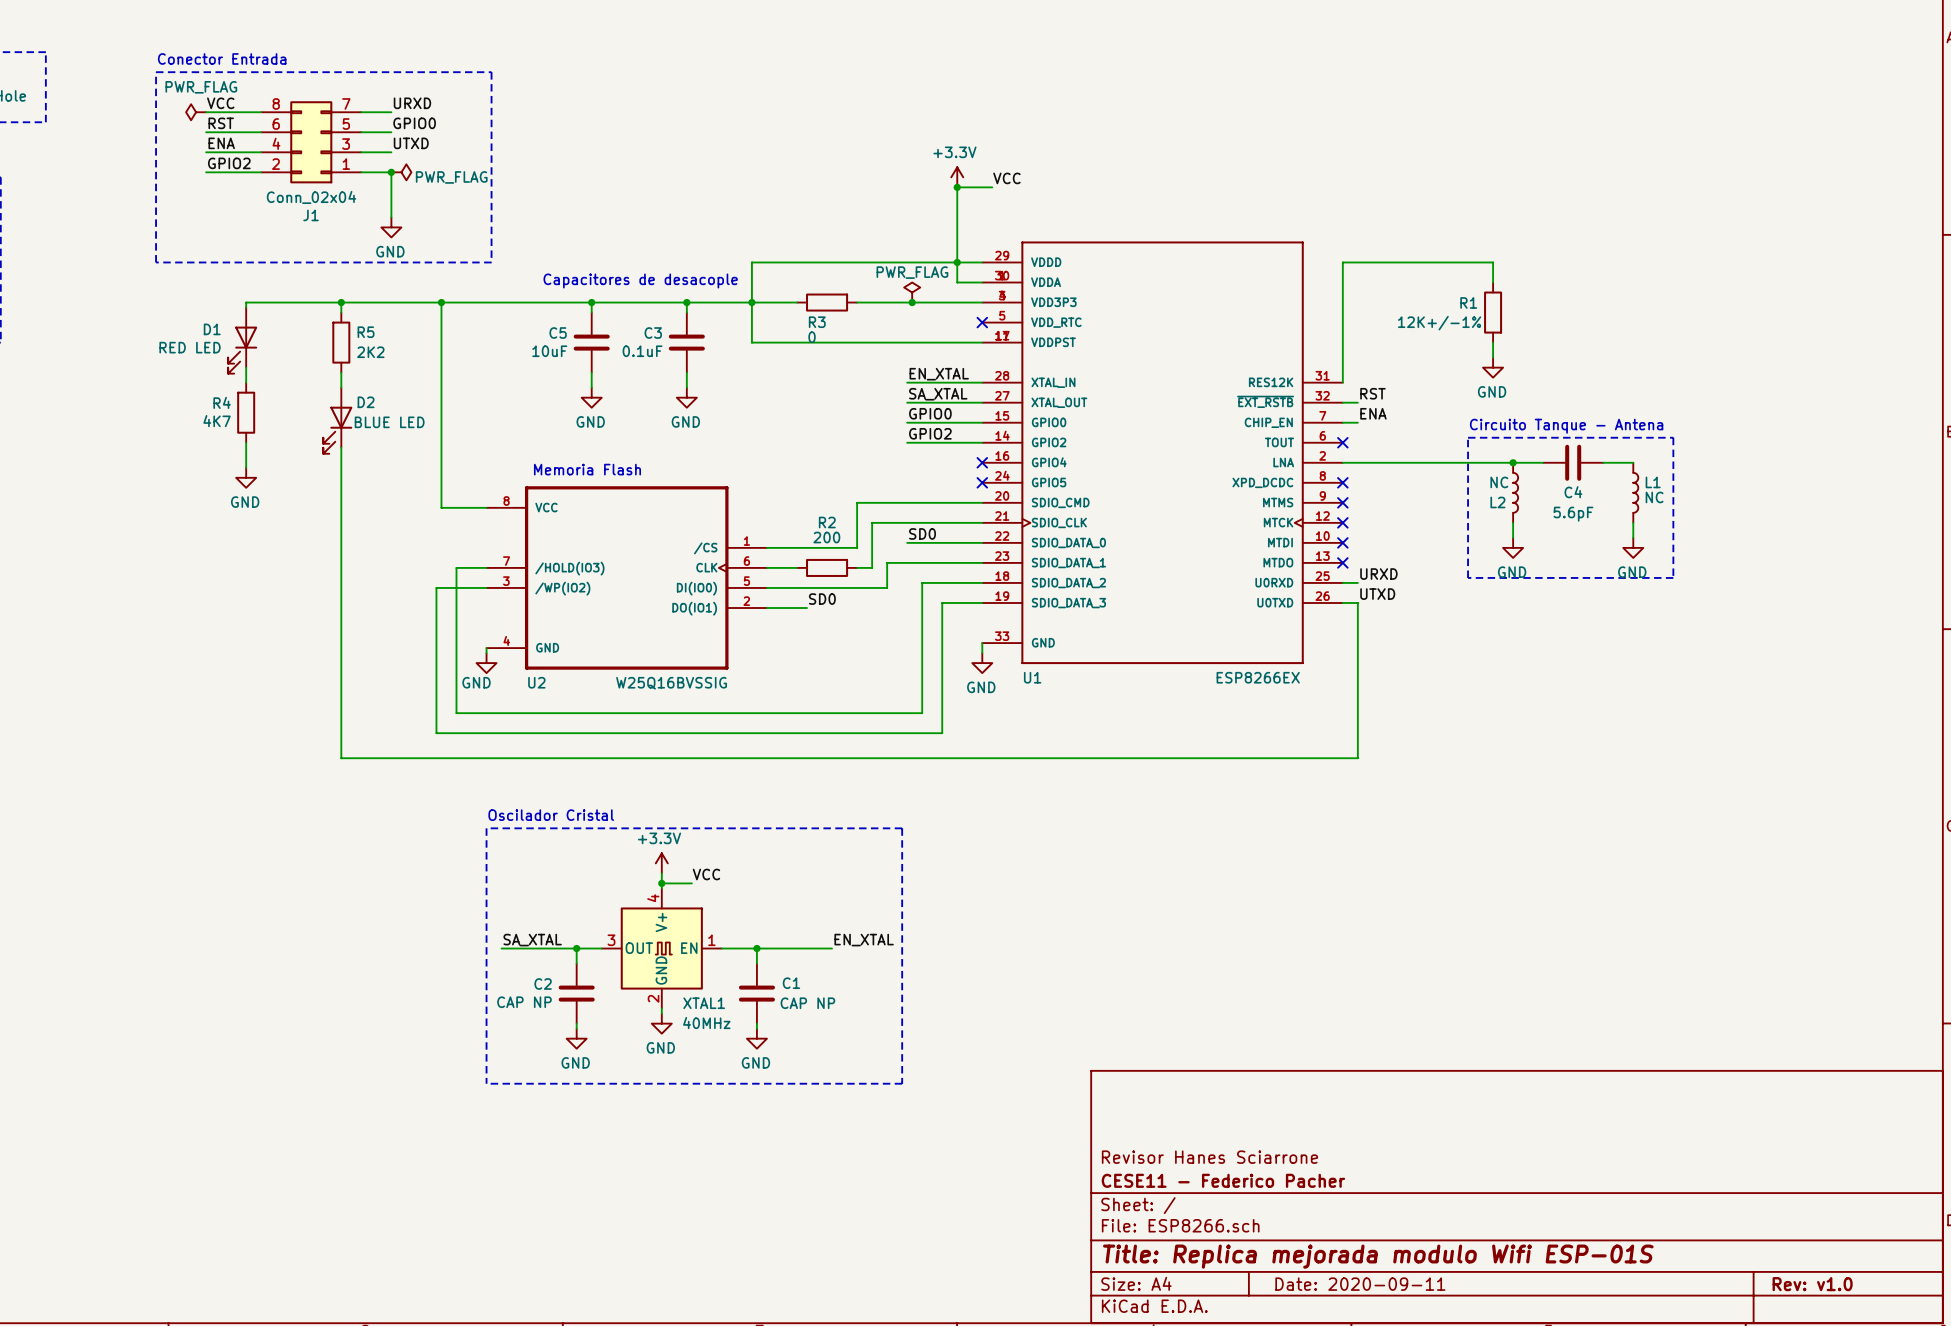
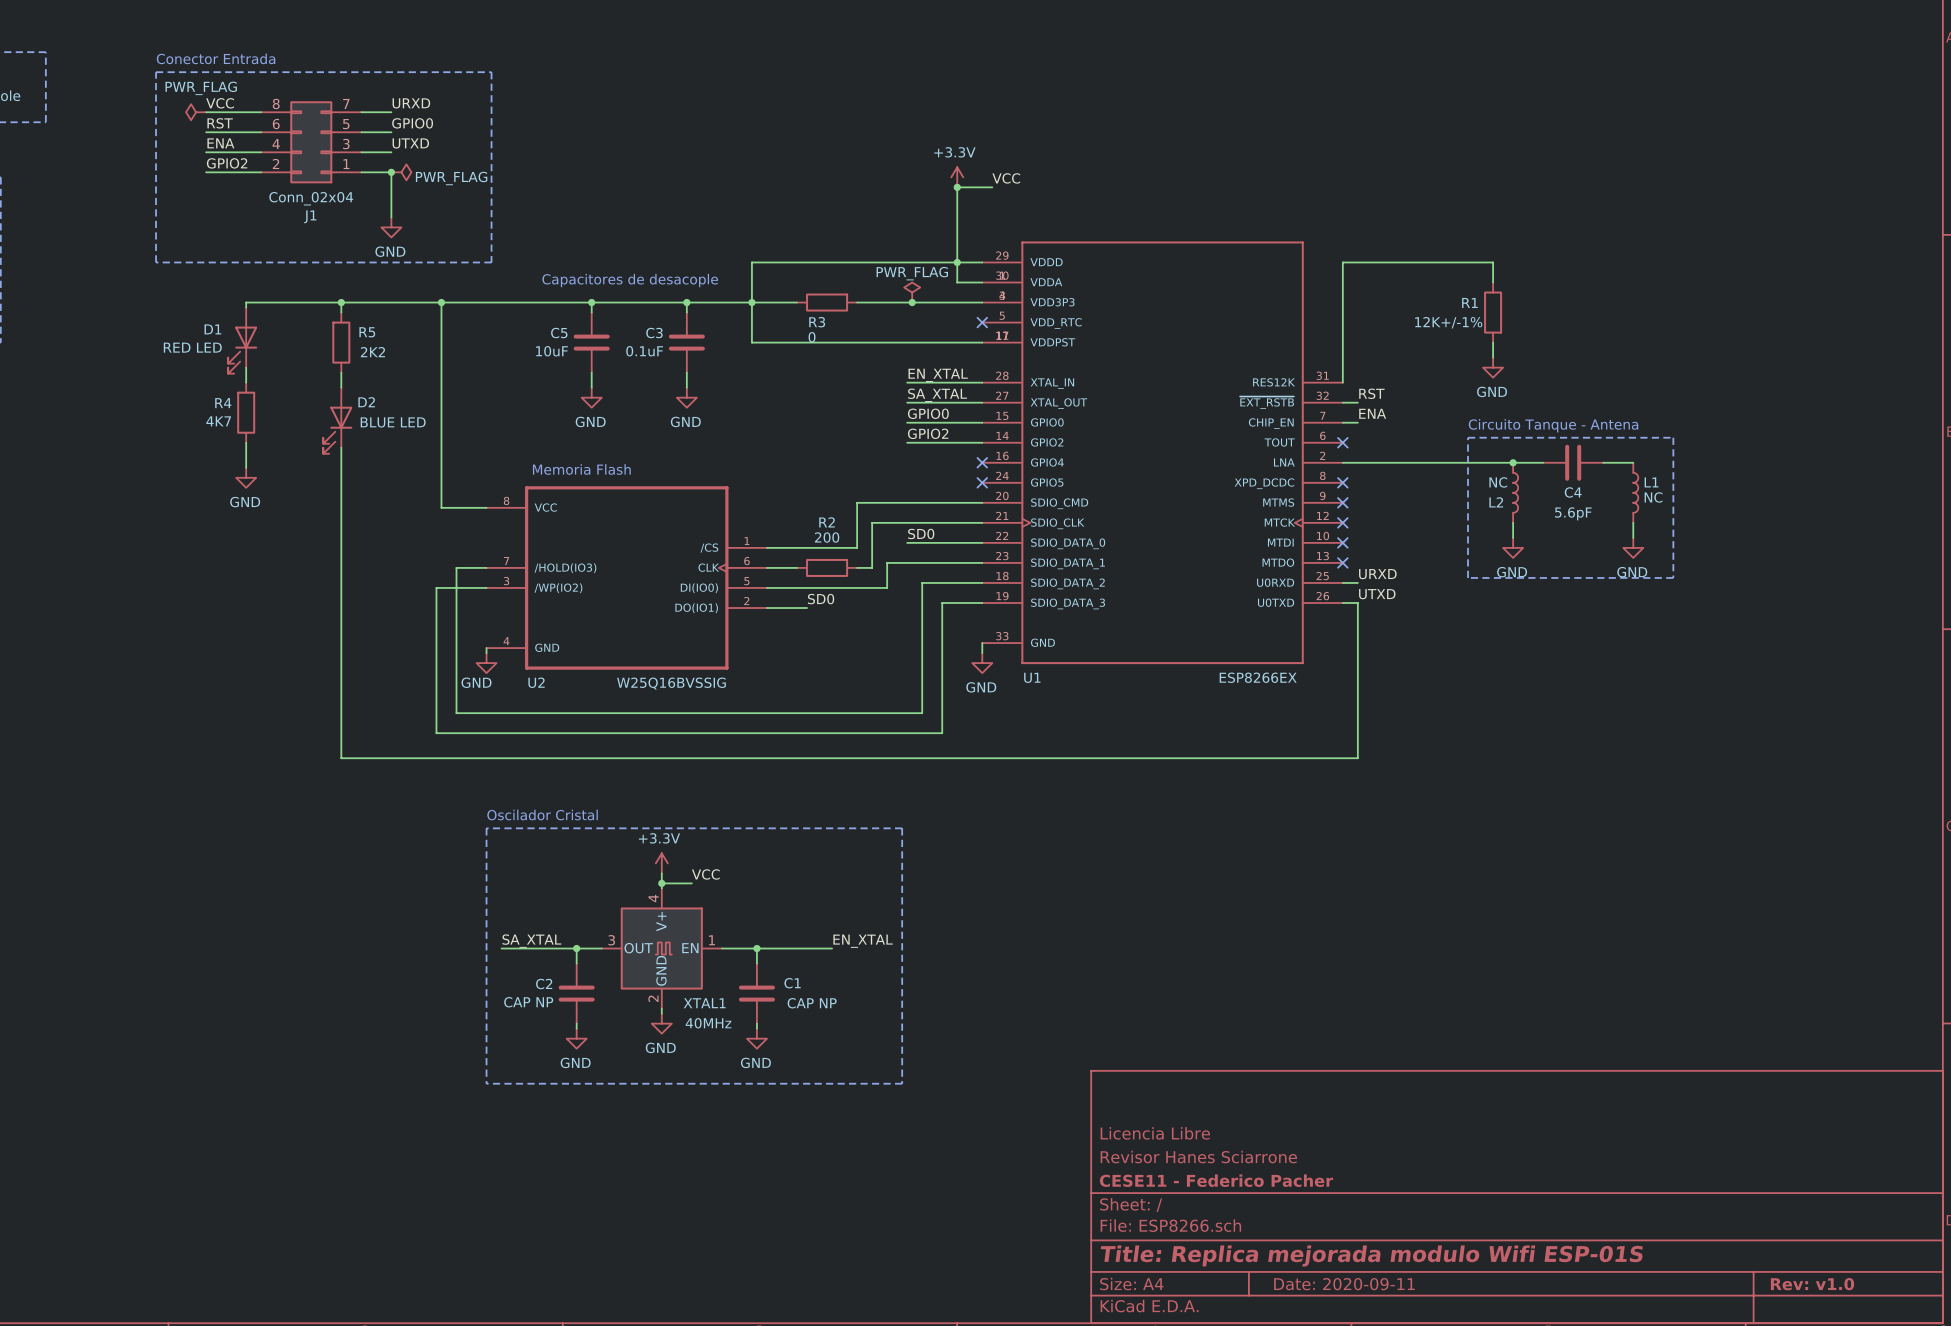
title block: none -> Licencia Libre (1155, 1133)

